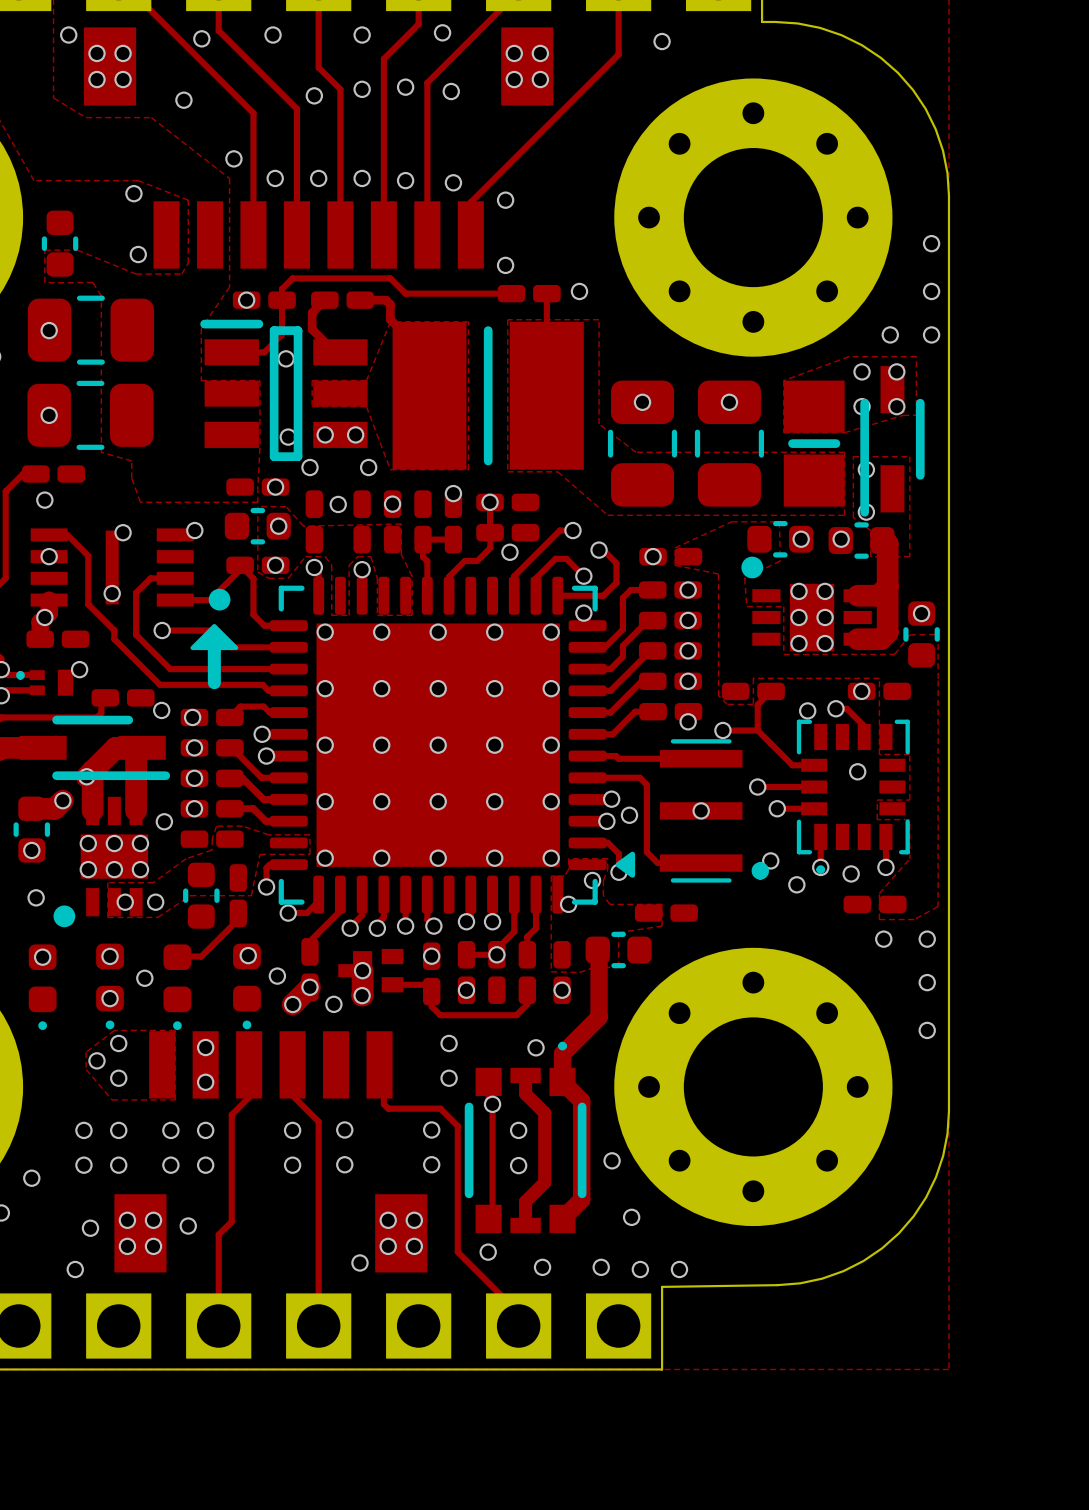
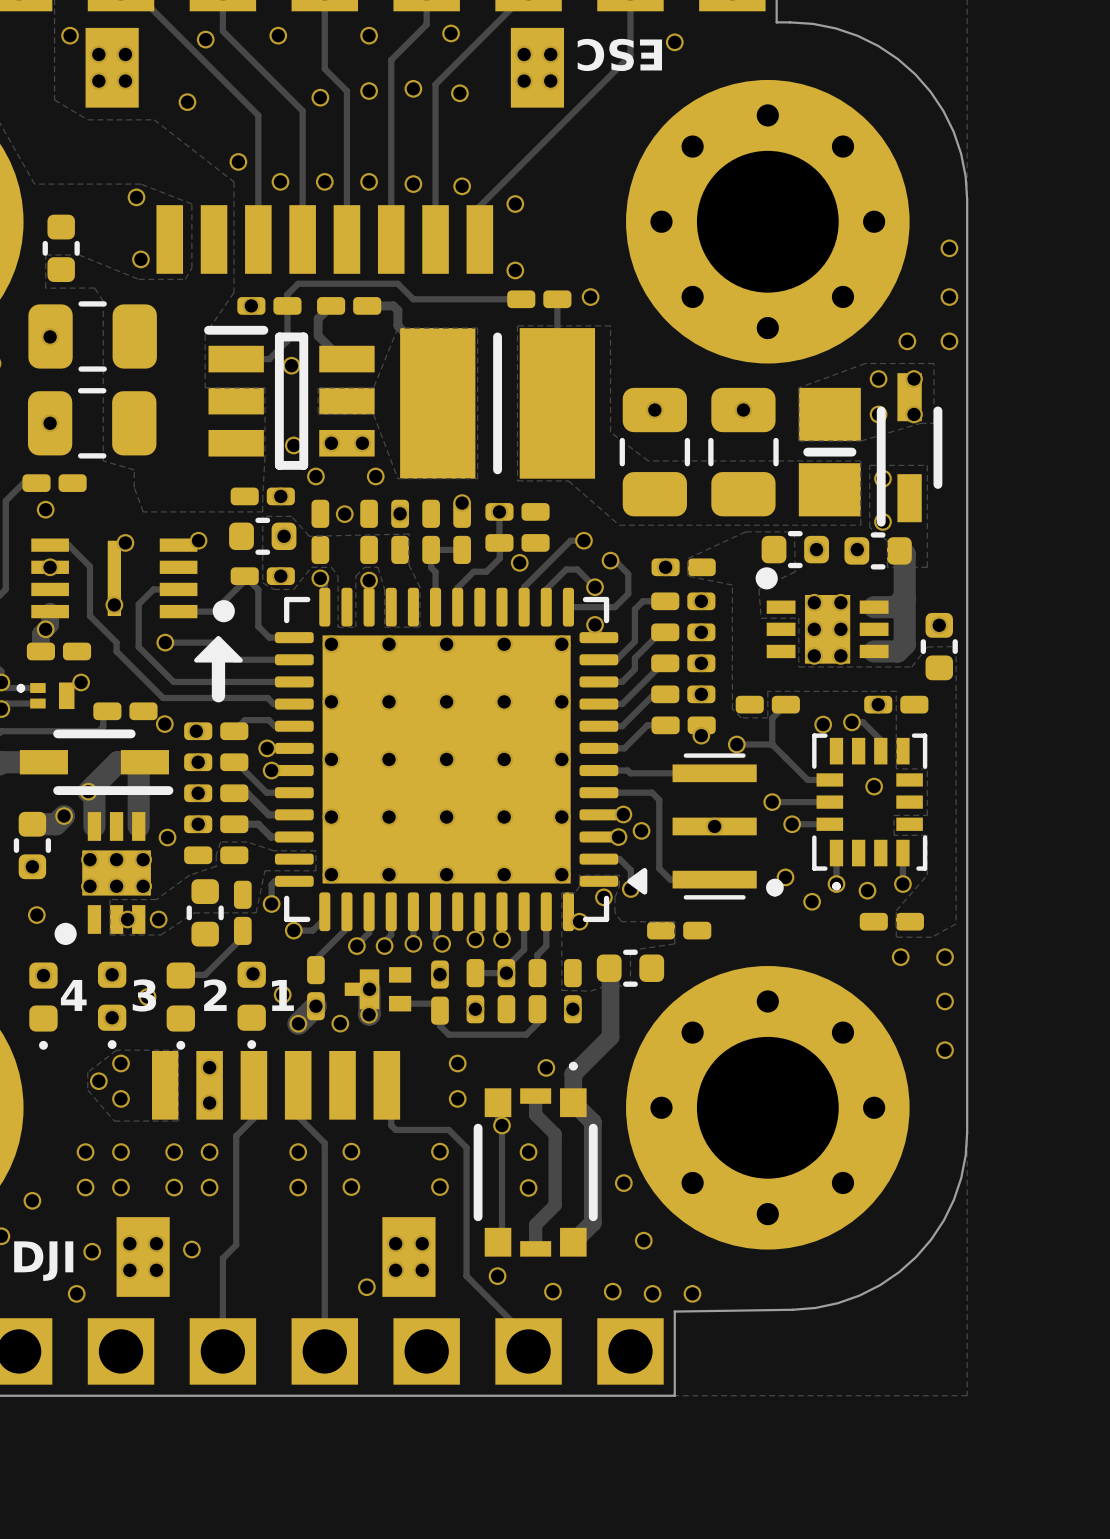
text: none -> ESC (619, 54)
text: none -> 4 (73, 995)
text: none -> 3 (144, 995)
text: none -> 2 (215, 995)
text: none -> 1 (282, 995)
text: none -> DJI (43, 1261)

